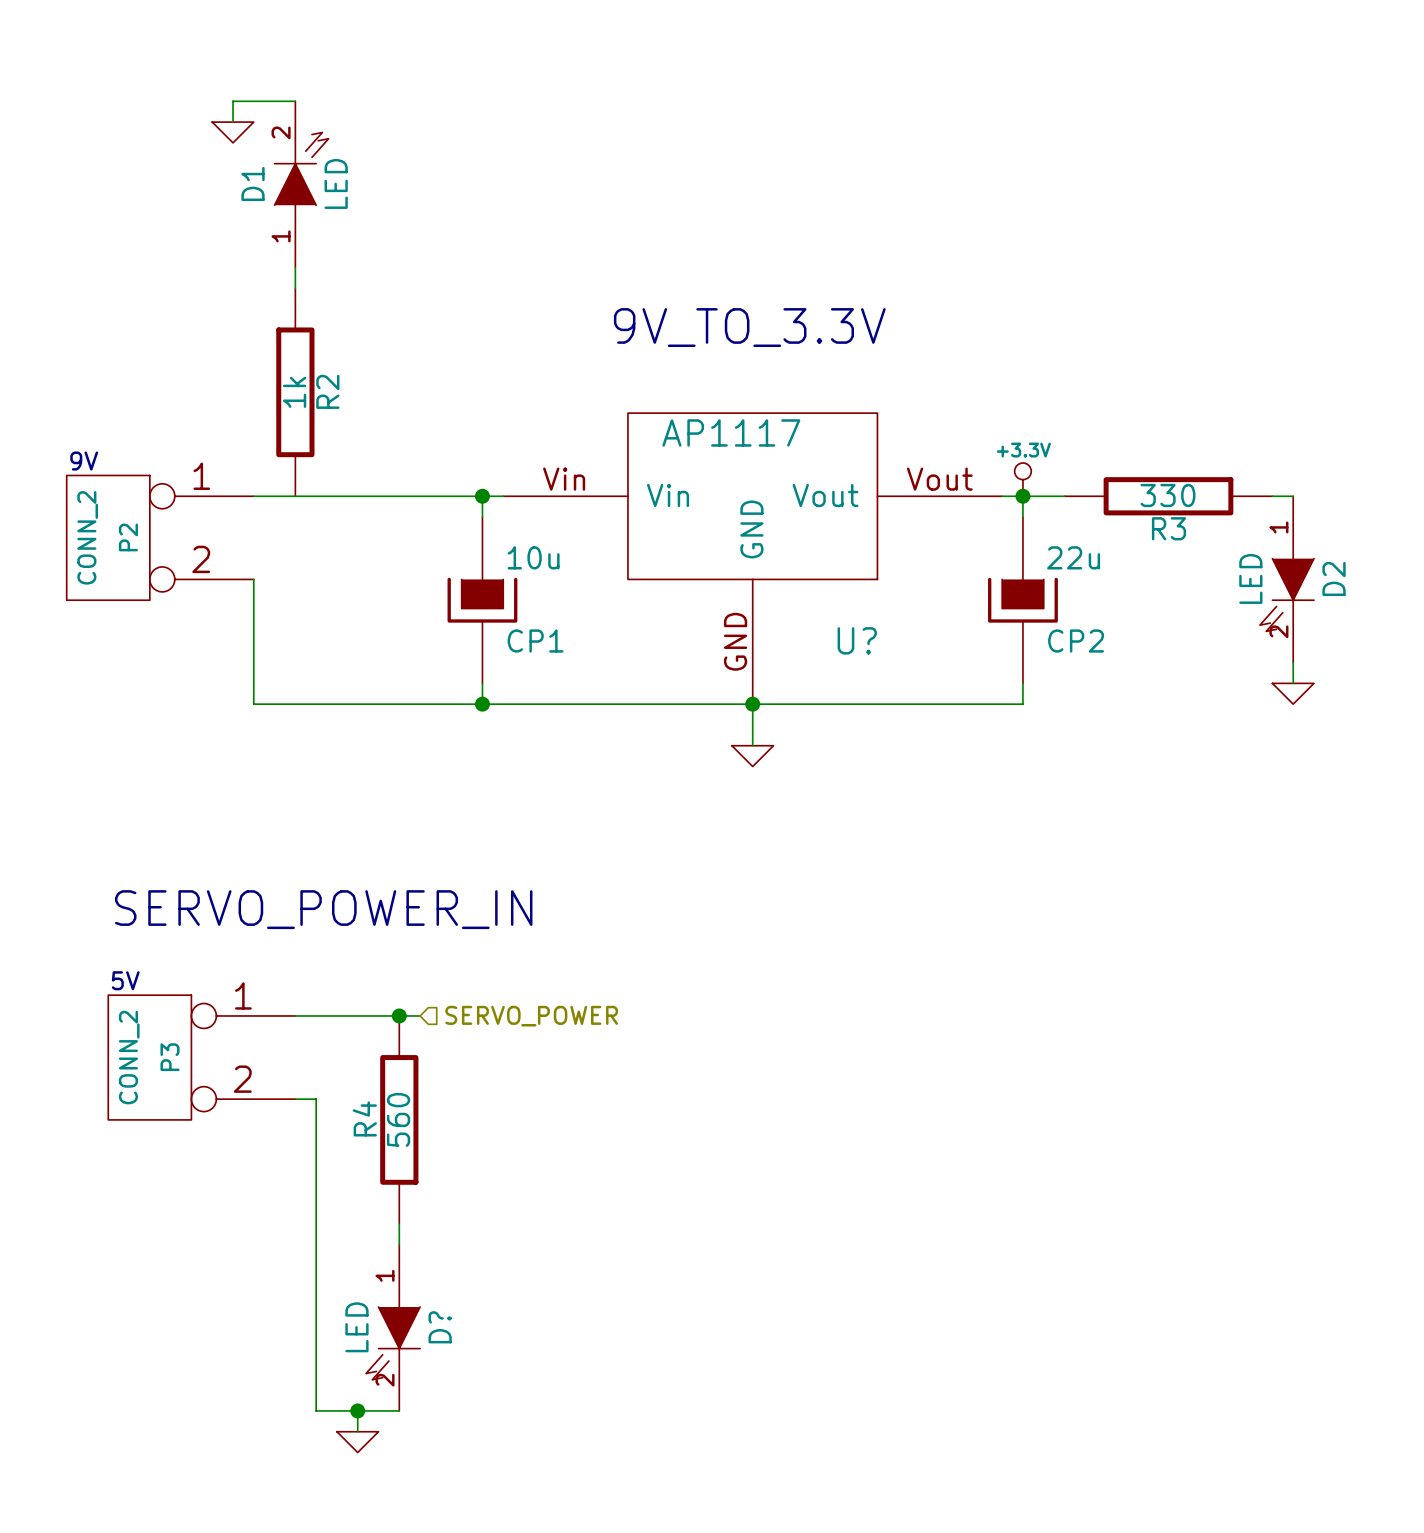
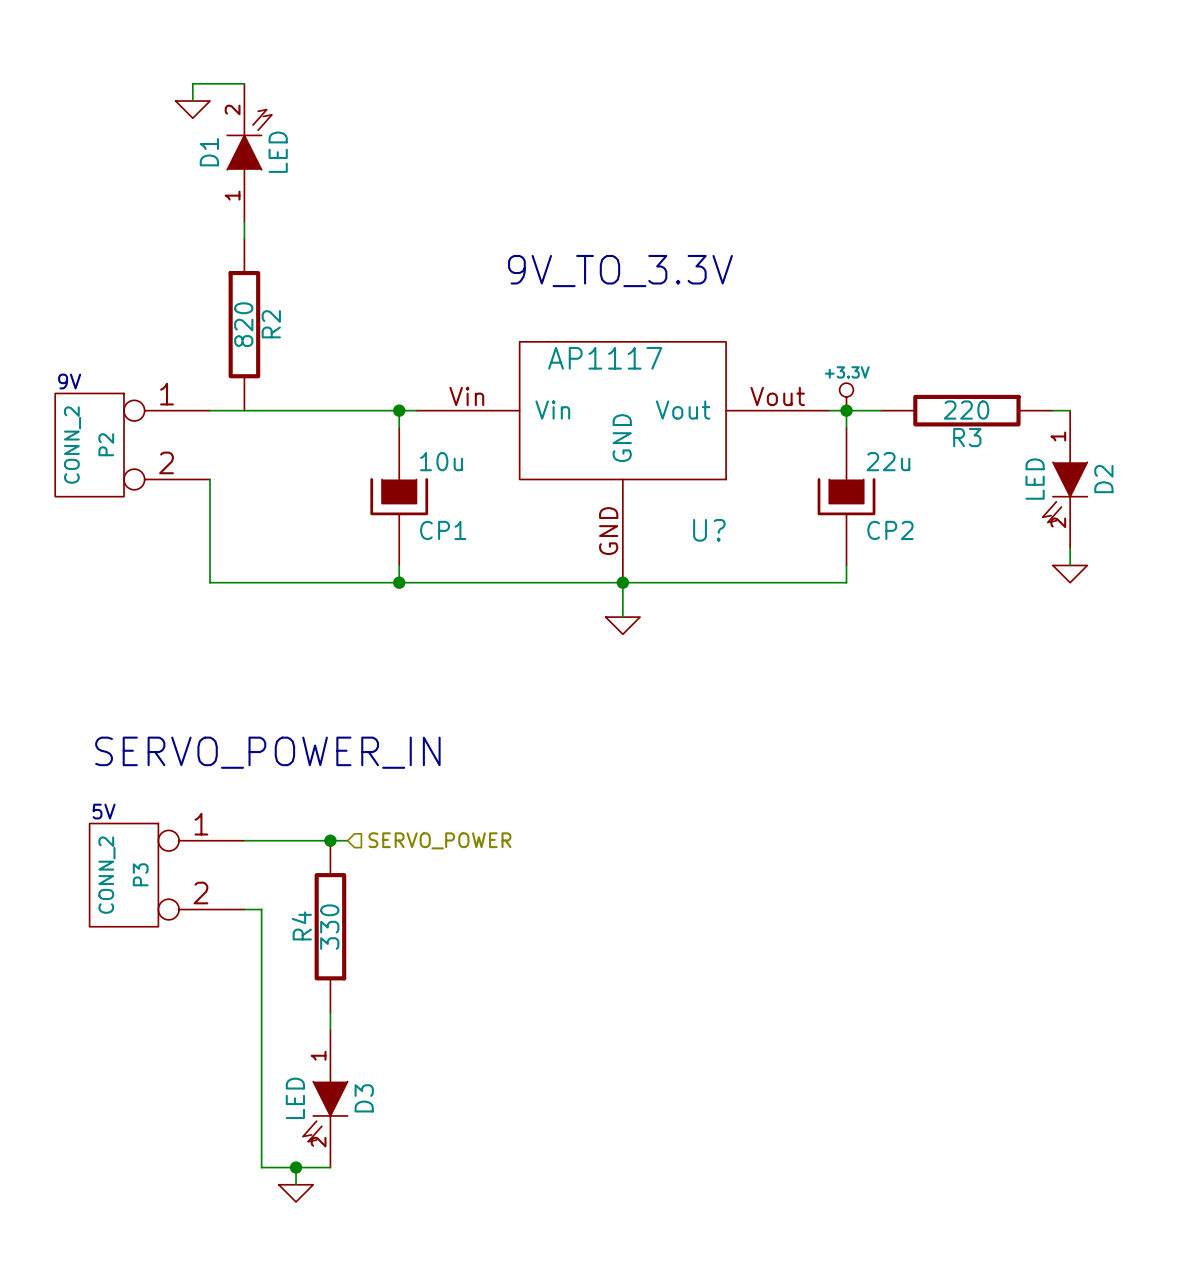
R2 value: 1k (294, 392) -> 820 (243, 324)
R3 value: 330 (1167, 495) -> 220 (966, 410)
R4 value: 560 (398, 1119) -> 330 (329, 927)
D? name: D? (440, 1327) -> D3 (364, 1098)

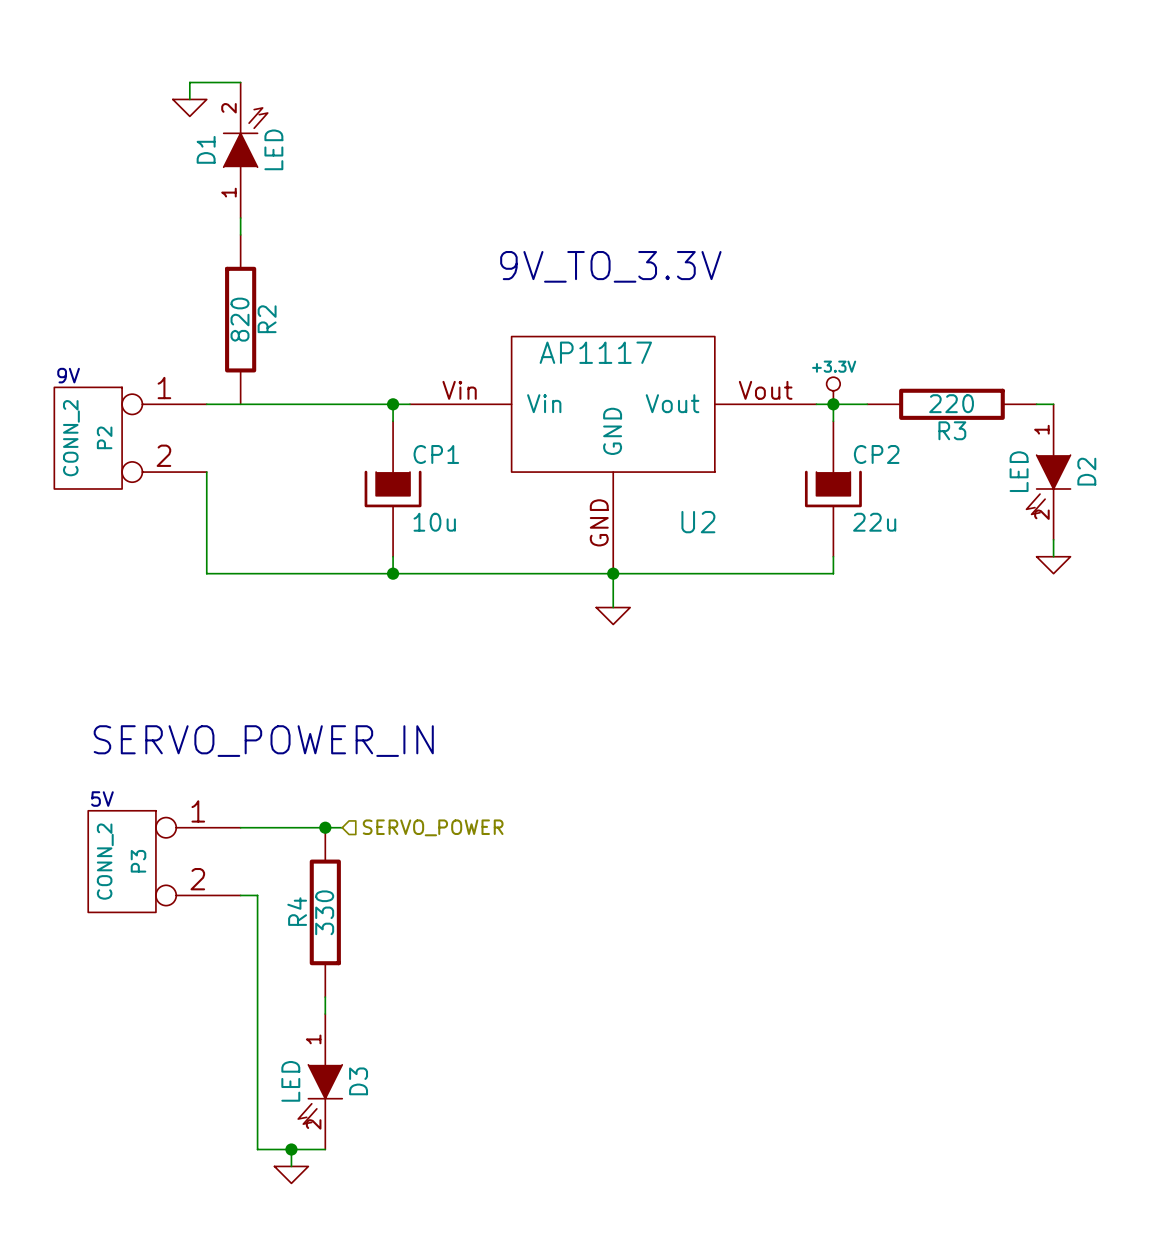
10u name: 10u (441, 461) -> CP1 (436, 454)
22u name: 22u (888, 461) -> CP2 (876, 454)
10u value: CP1 (443, 530) -> 10u (434, 522)
U? name: U? (709, 530) -> U2 (698, 522)
22u value: CP2 (890, 530) -> 22u (874, 522)

